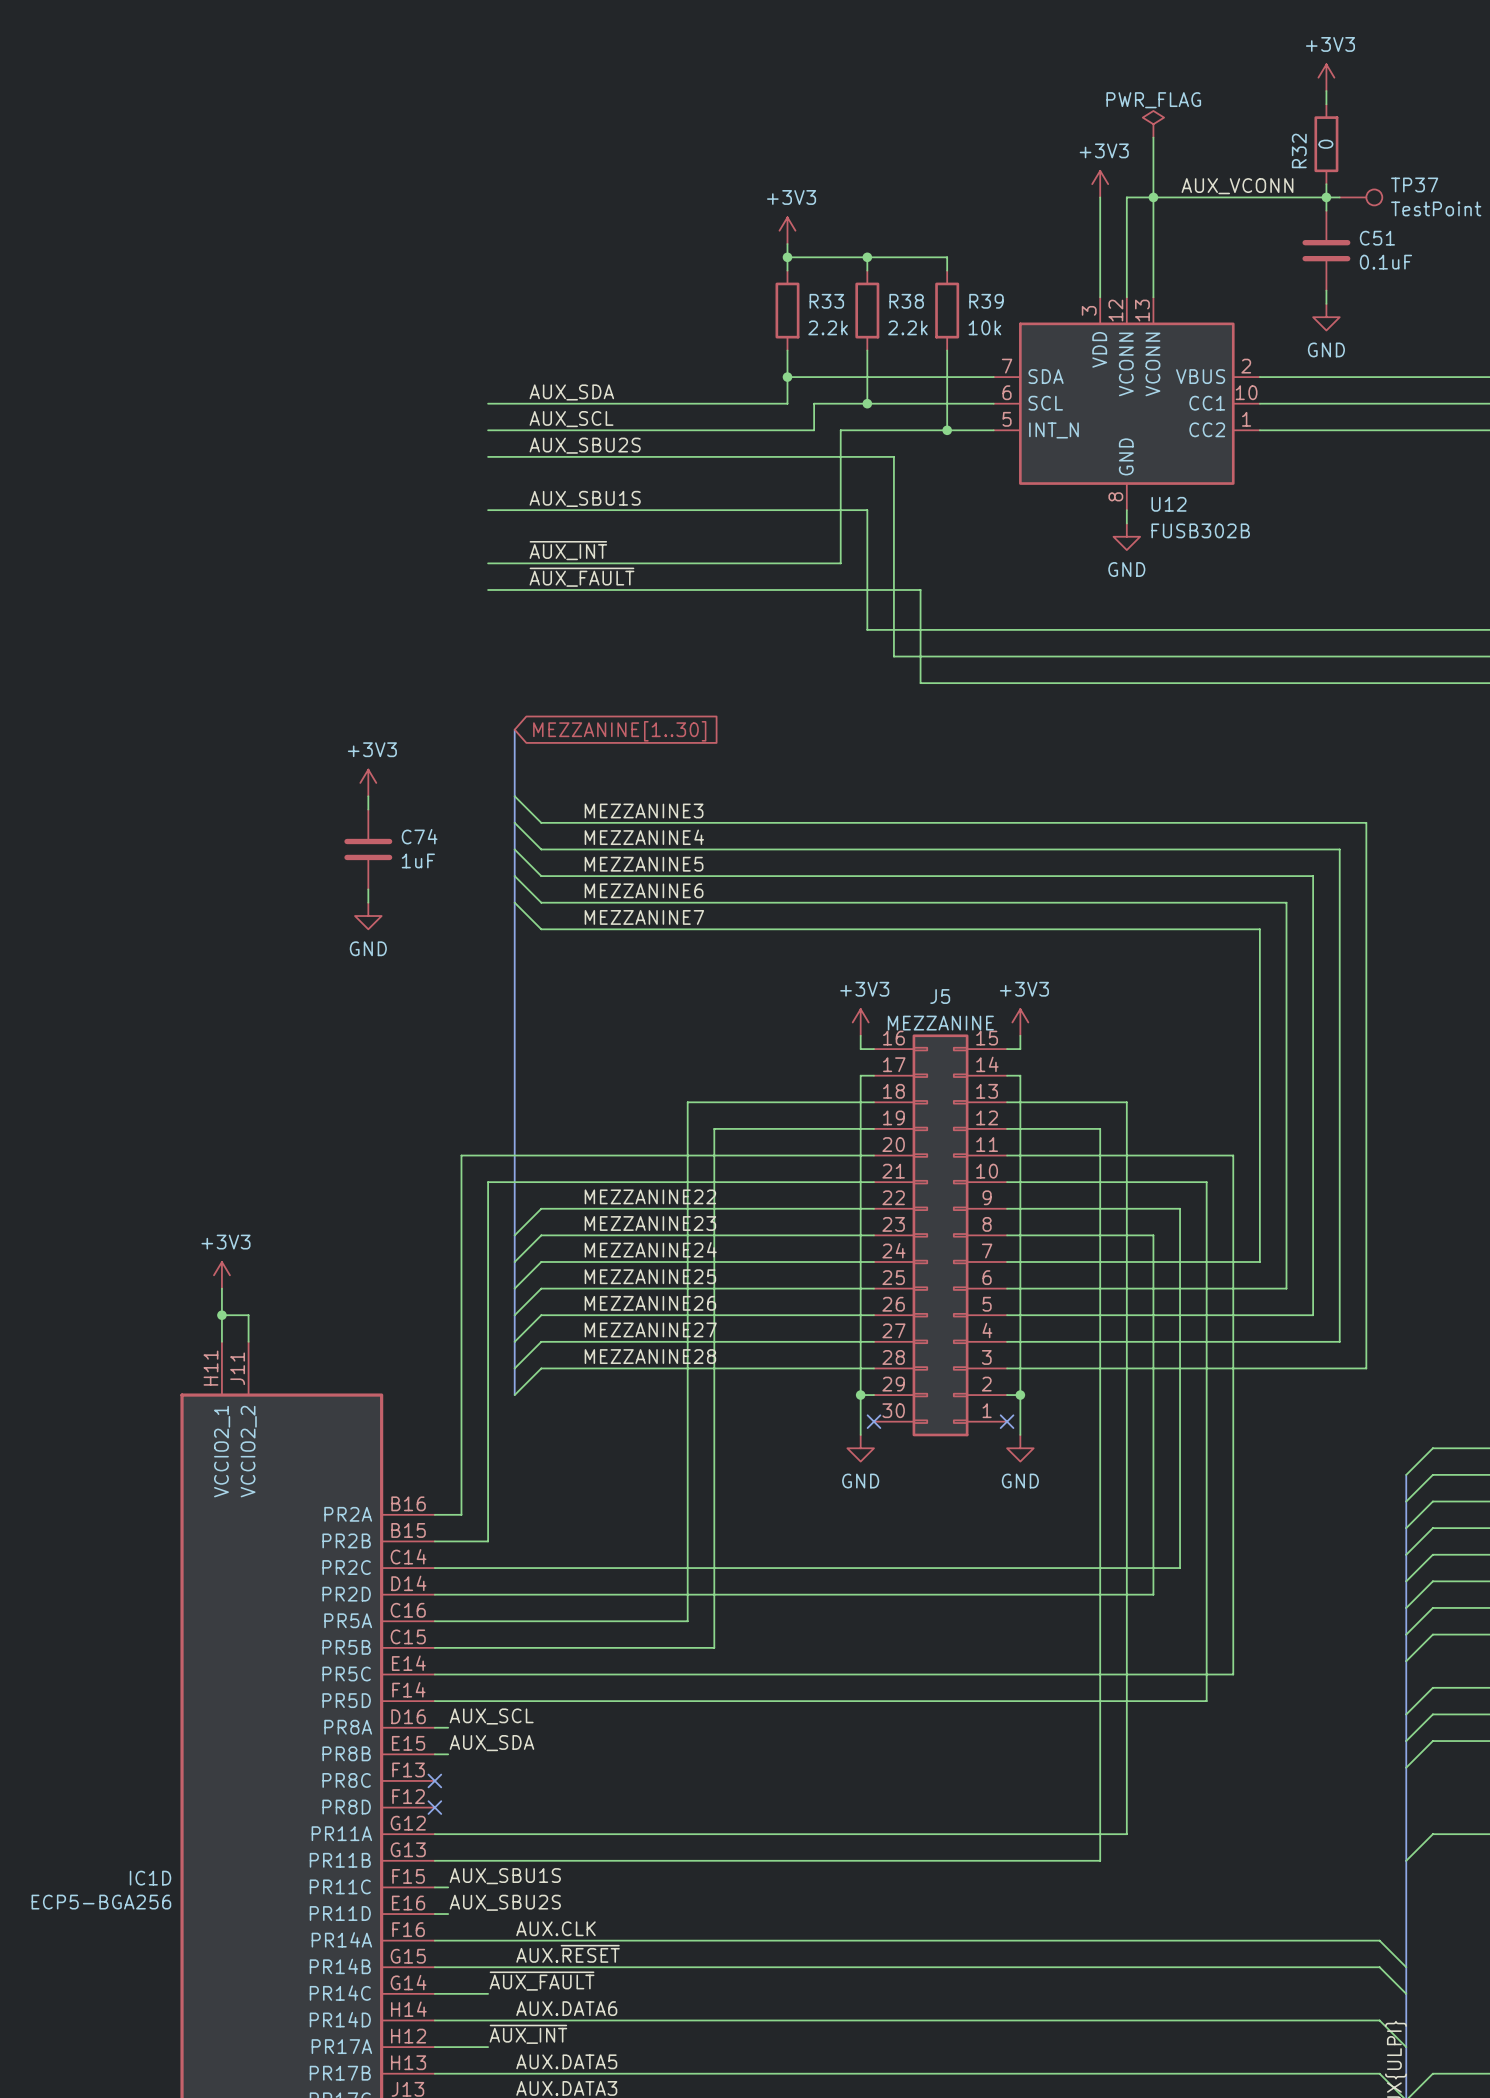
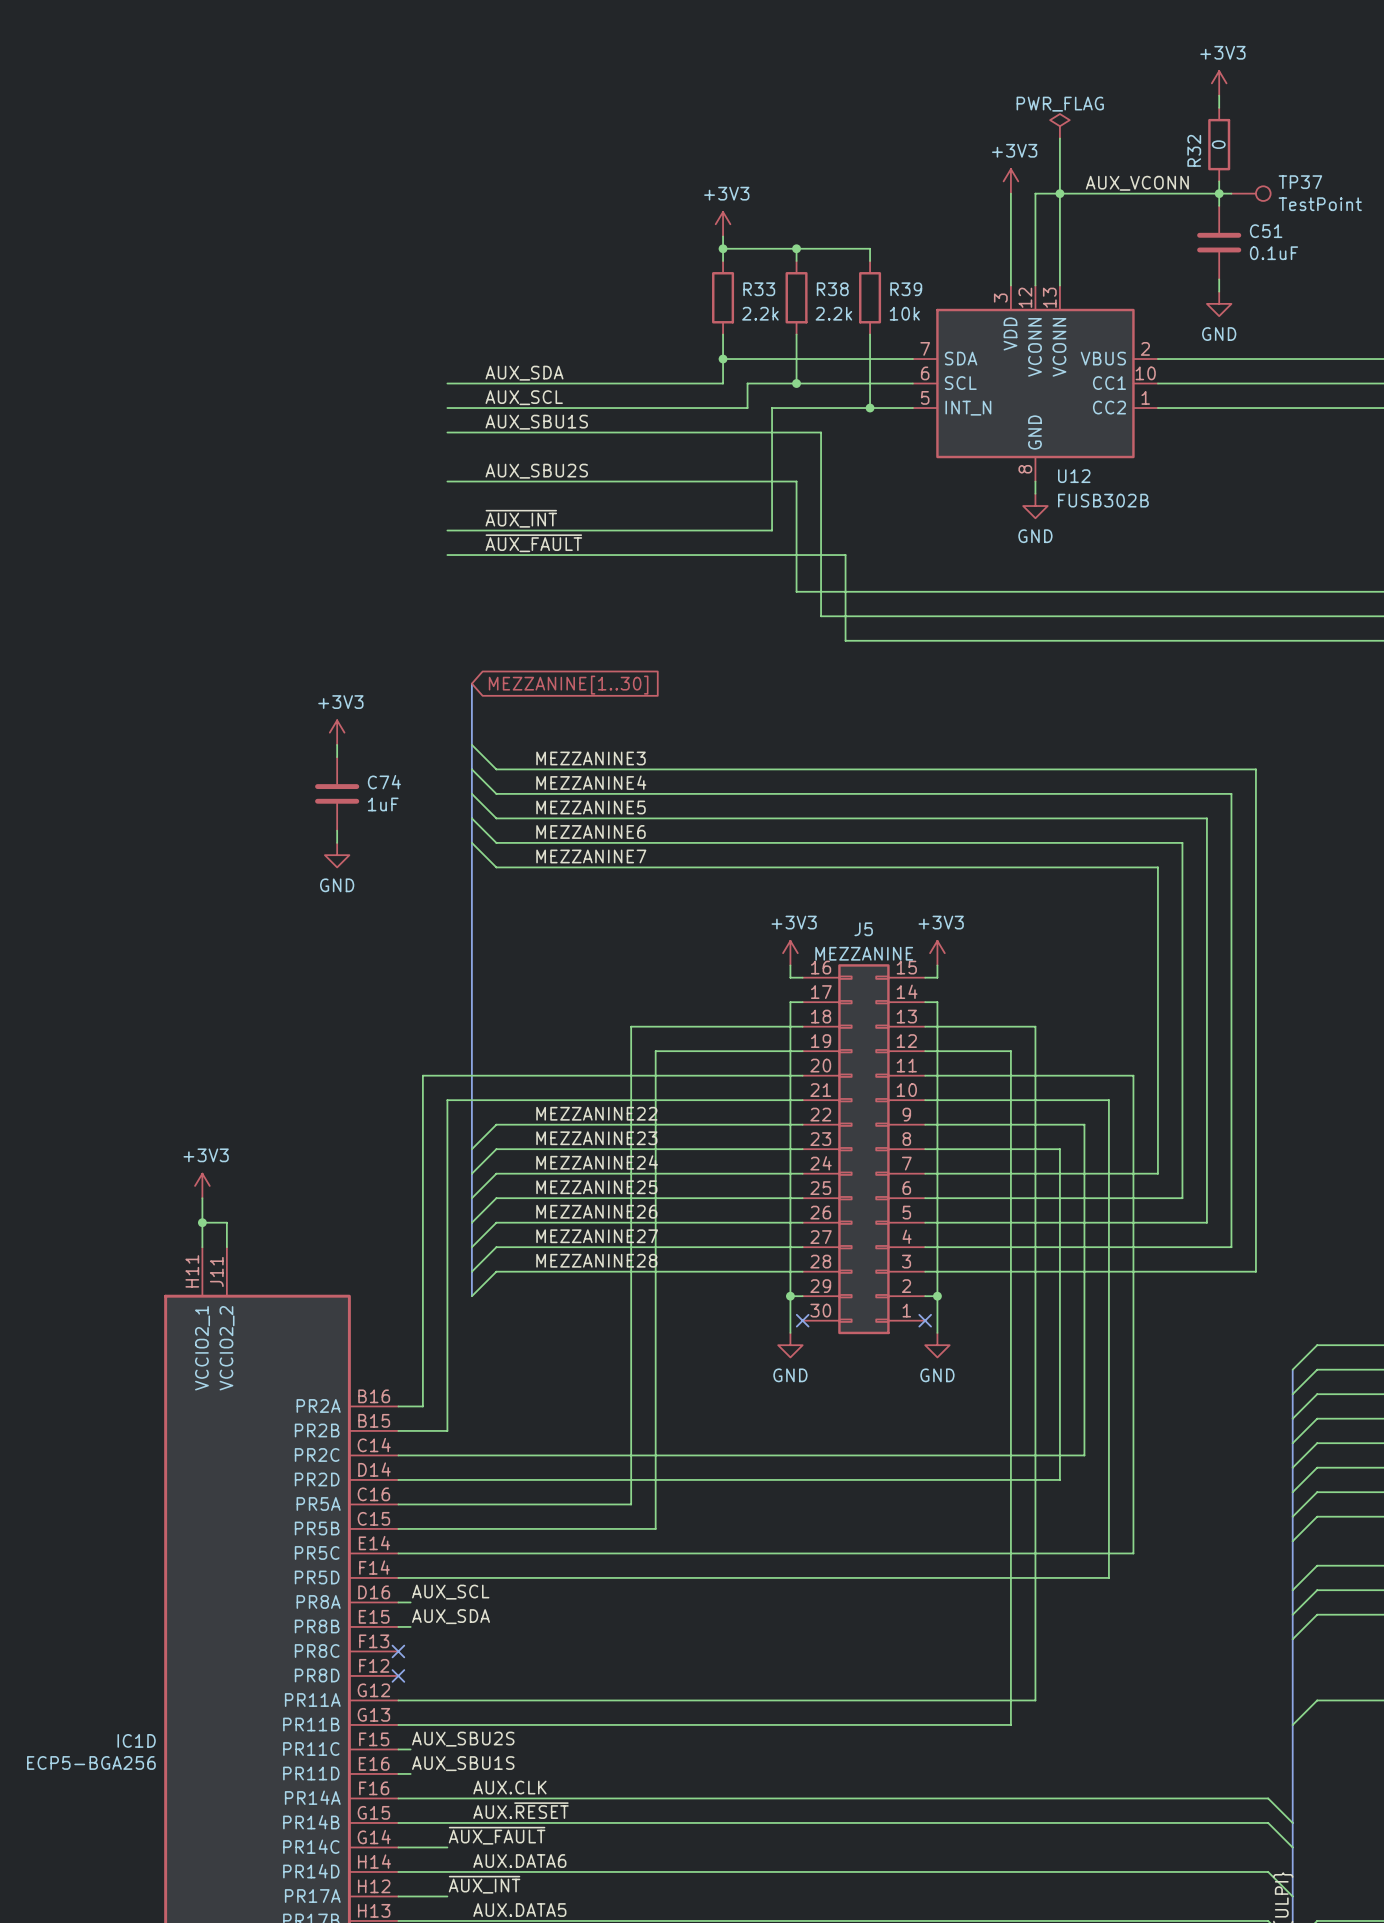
label: AUX_SBU2S (585, 445) -> AUX_SBU1S (536, 422)
label: AUX_SBU1S (585, 498) -> AUX_SBU2S (536, 471)
label: AUX_SBU1S (505, 1876) -> AUX_SBU2S (463, 1739)
label: AUX_SBU2S (505, 1902) -> AUX_SBU1S (463, 1763)

